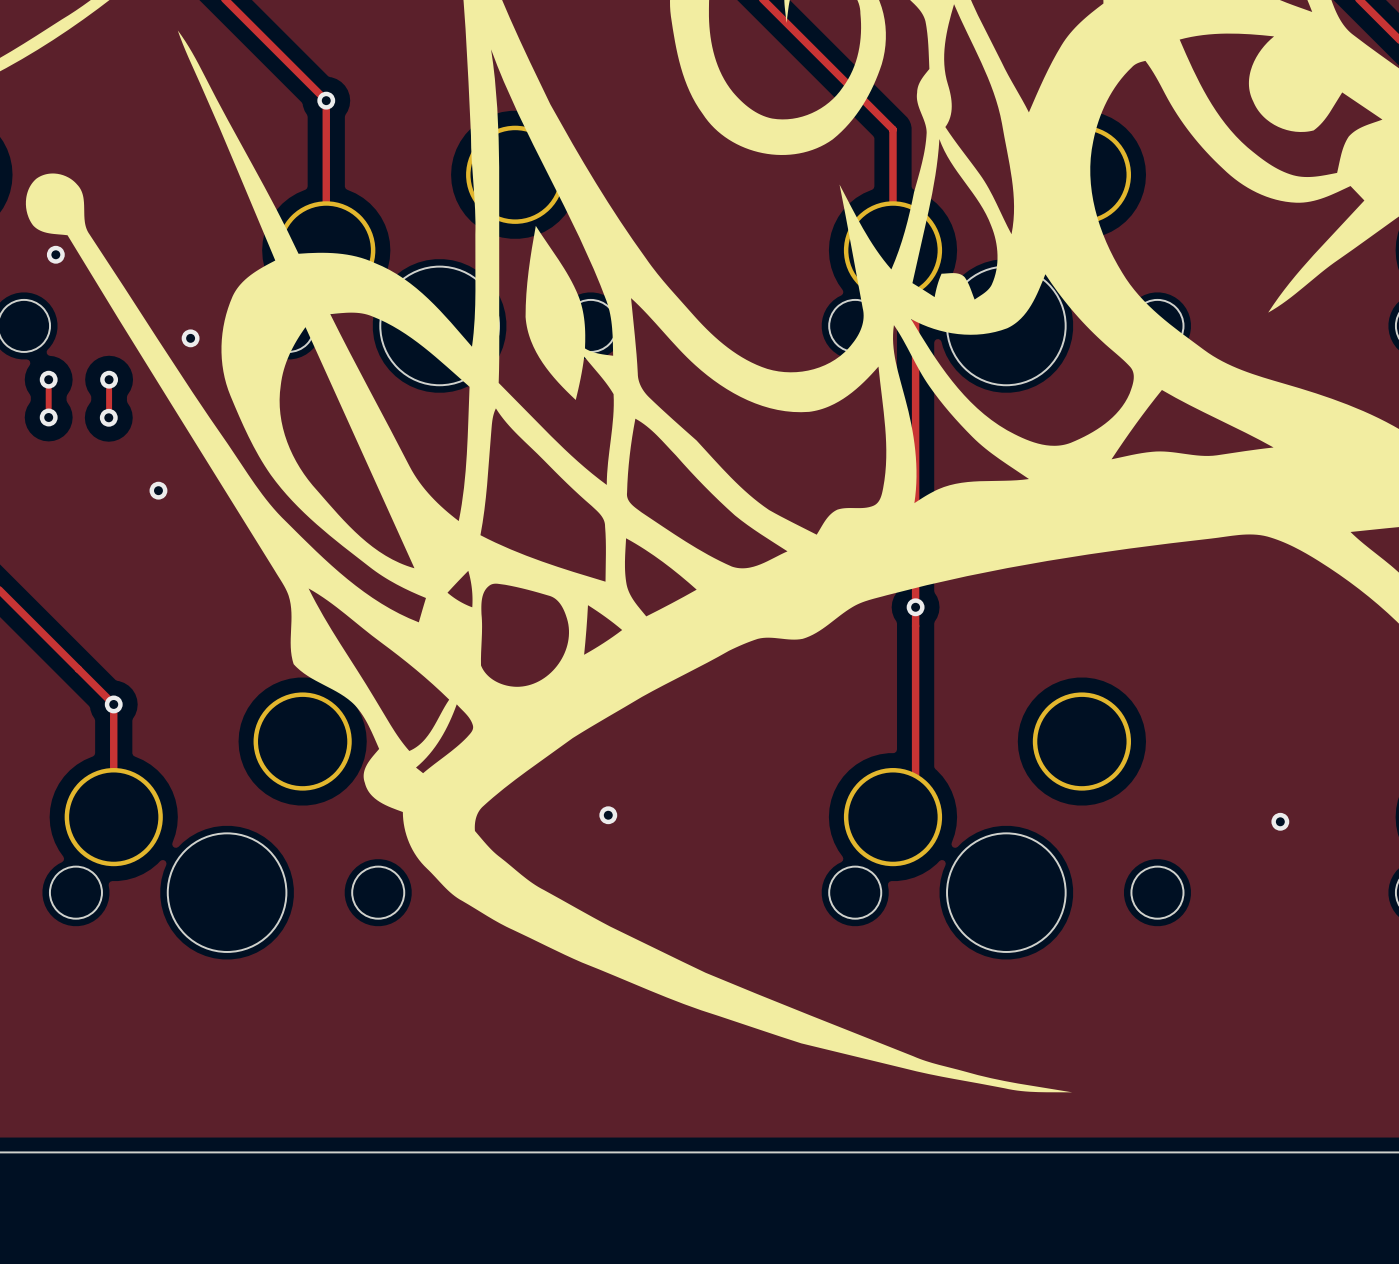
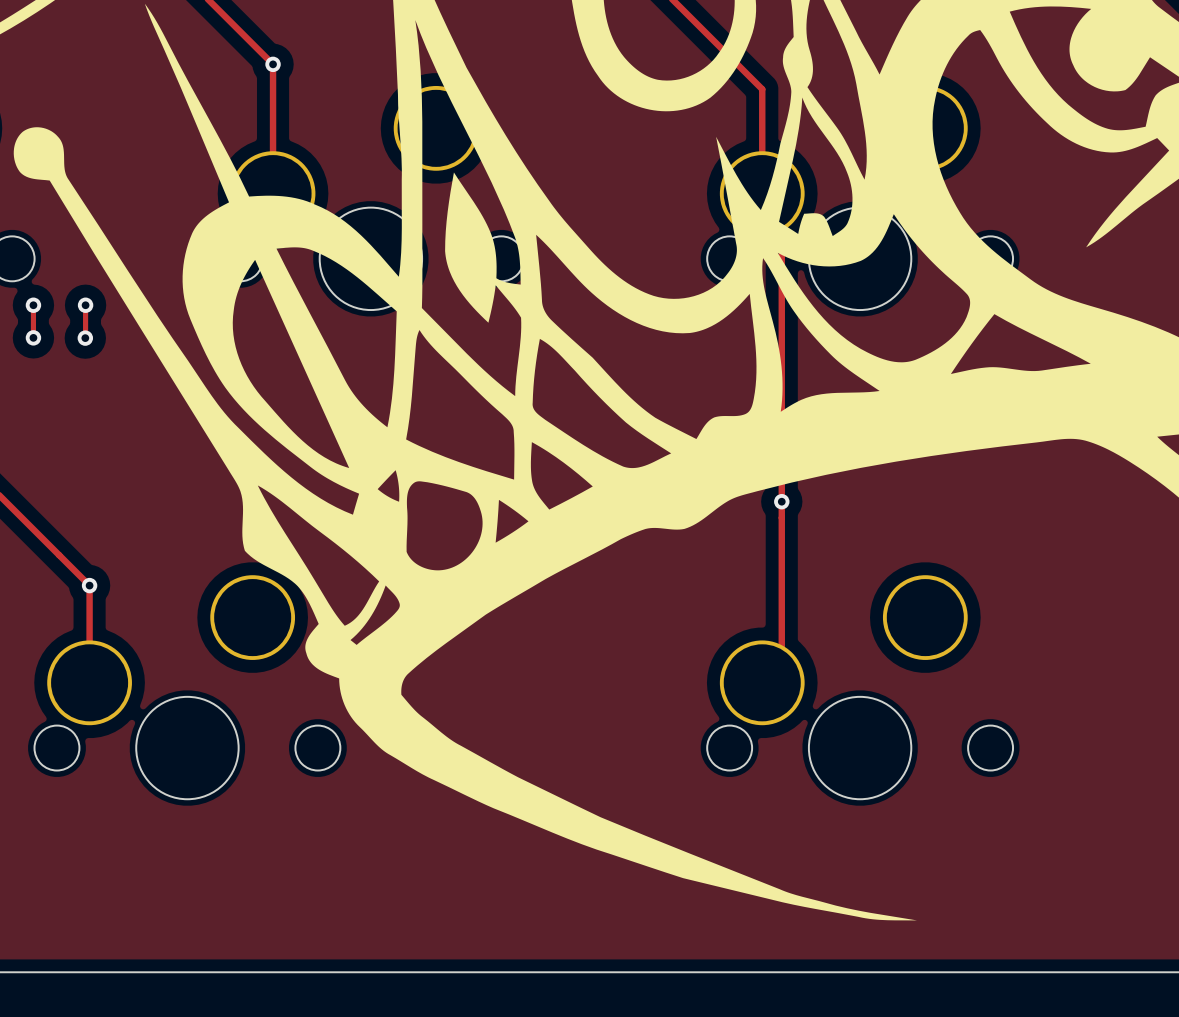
via: (55, 254) -> none
via: (190, 338) -> none
via: (158, 490) -> none
via: (608, 815) -> none
via: (1280, 821) -> none

